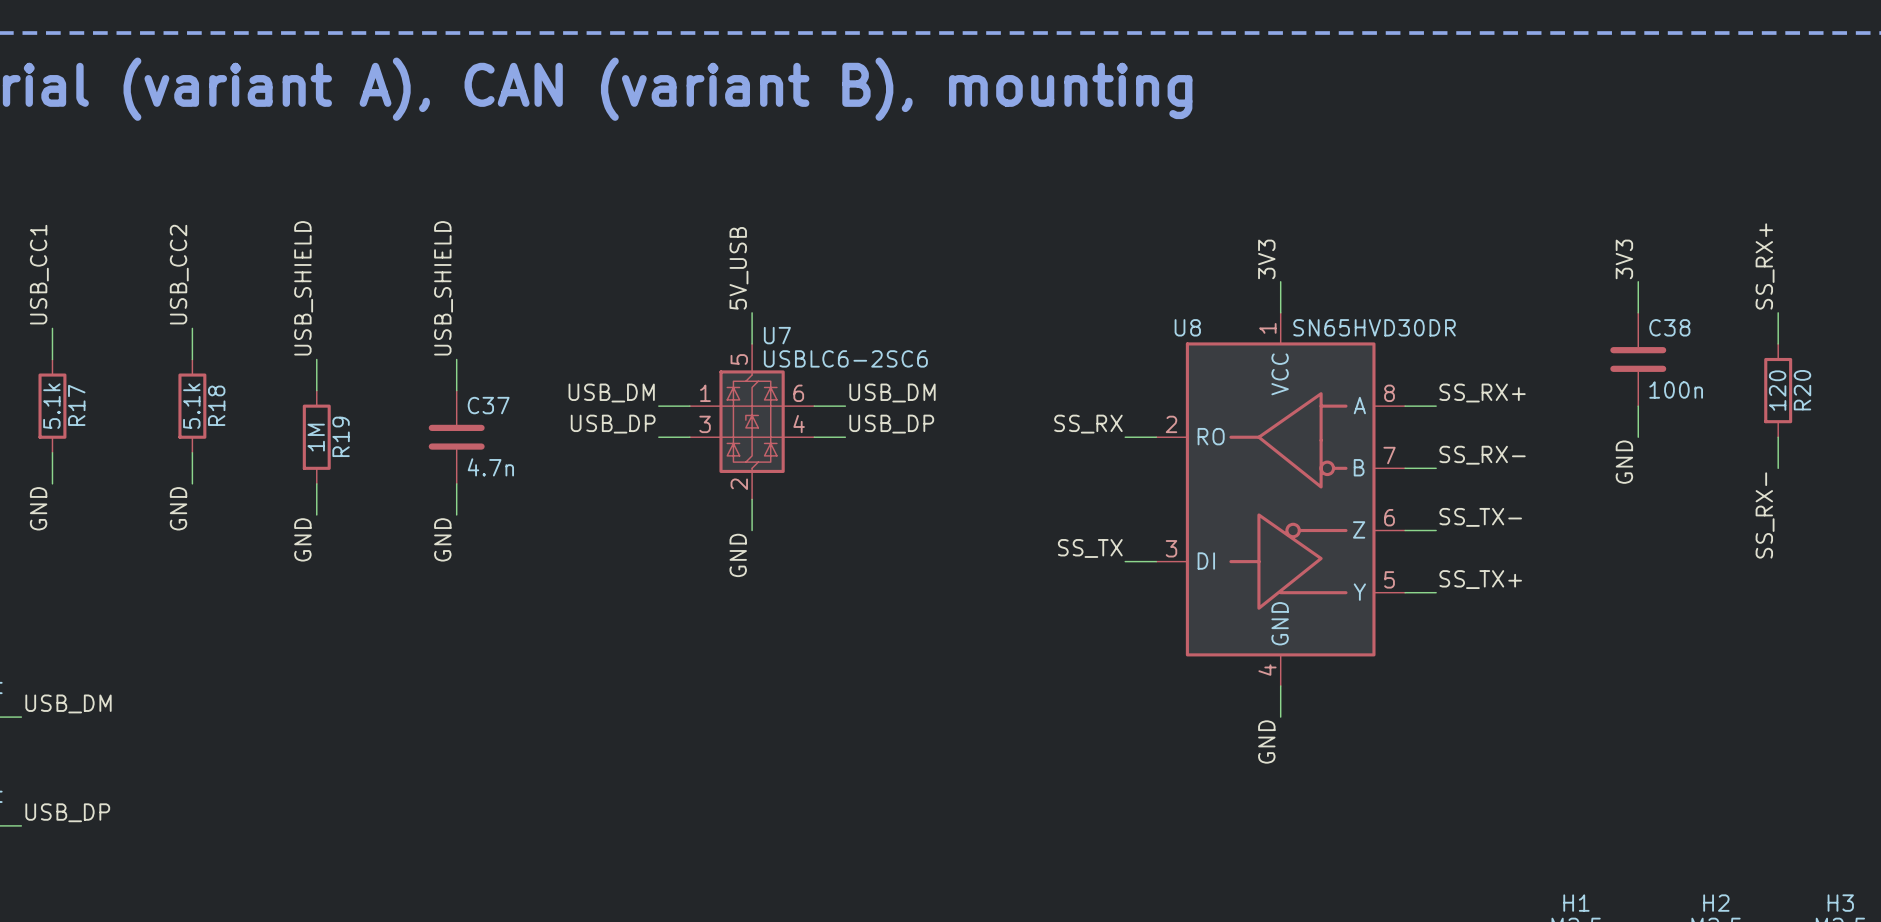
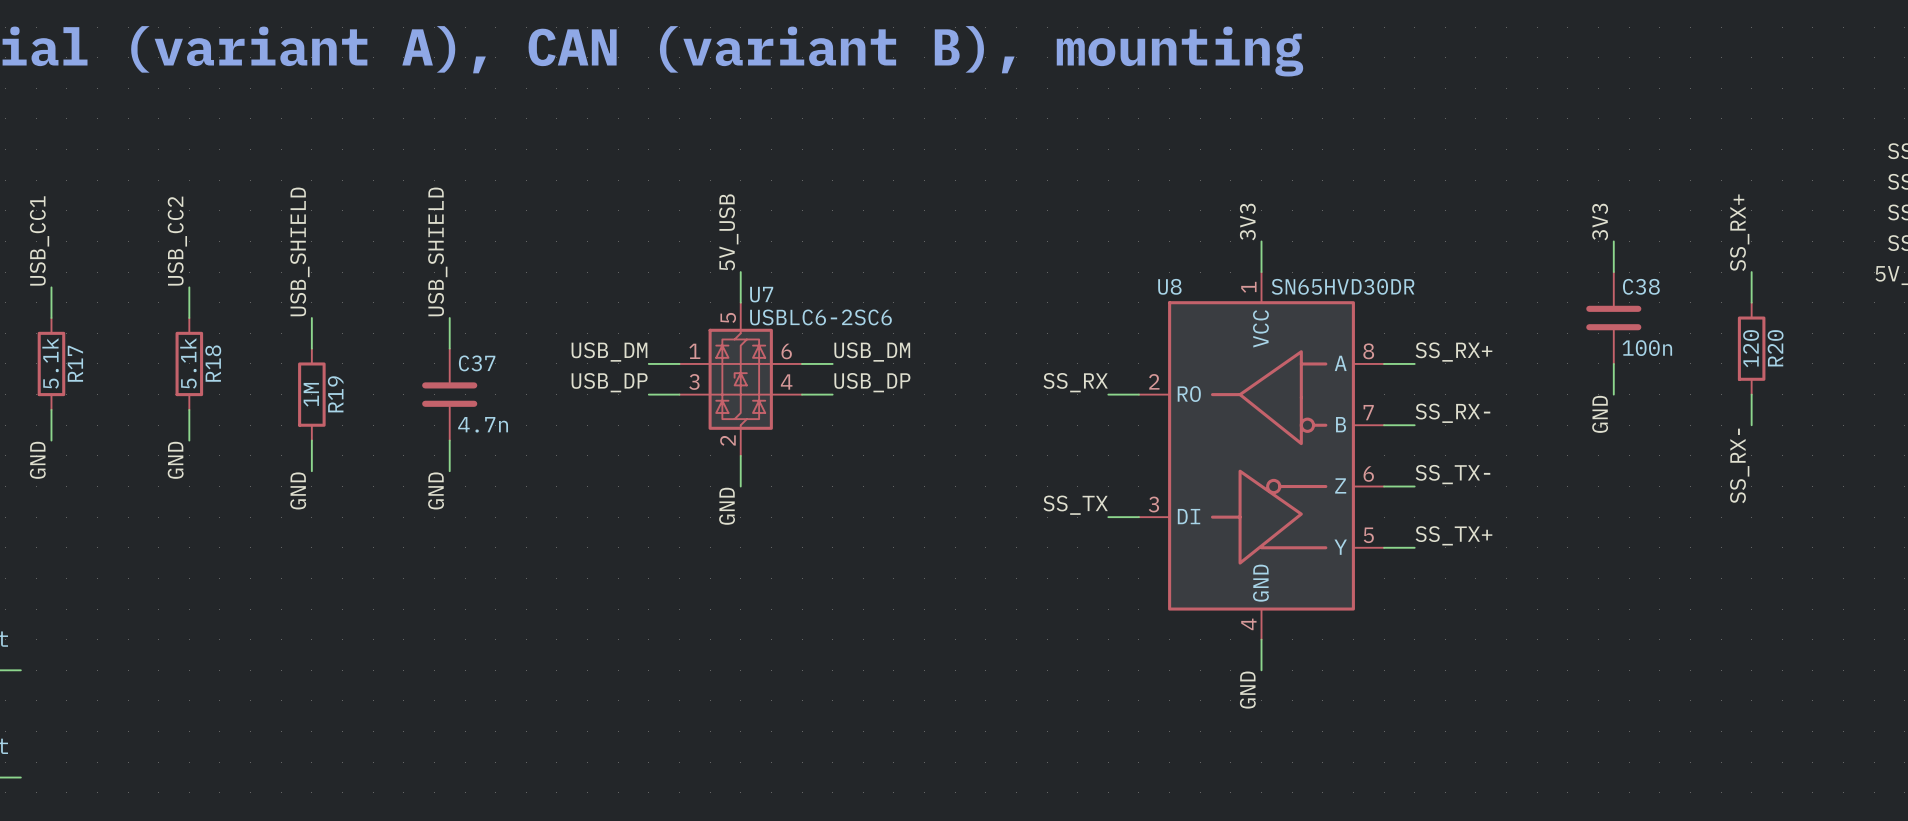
label: USB_DM (68, 703) -> none
label: USB_DP (67, 812) -> none

